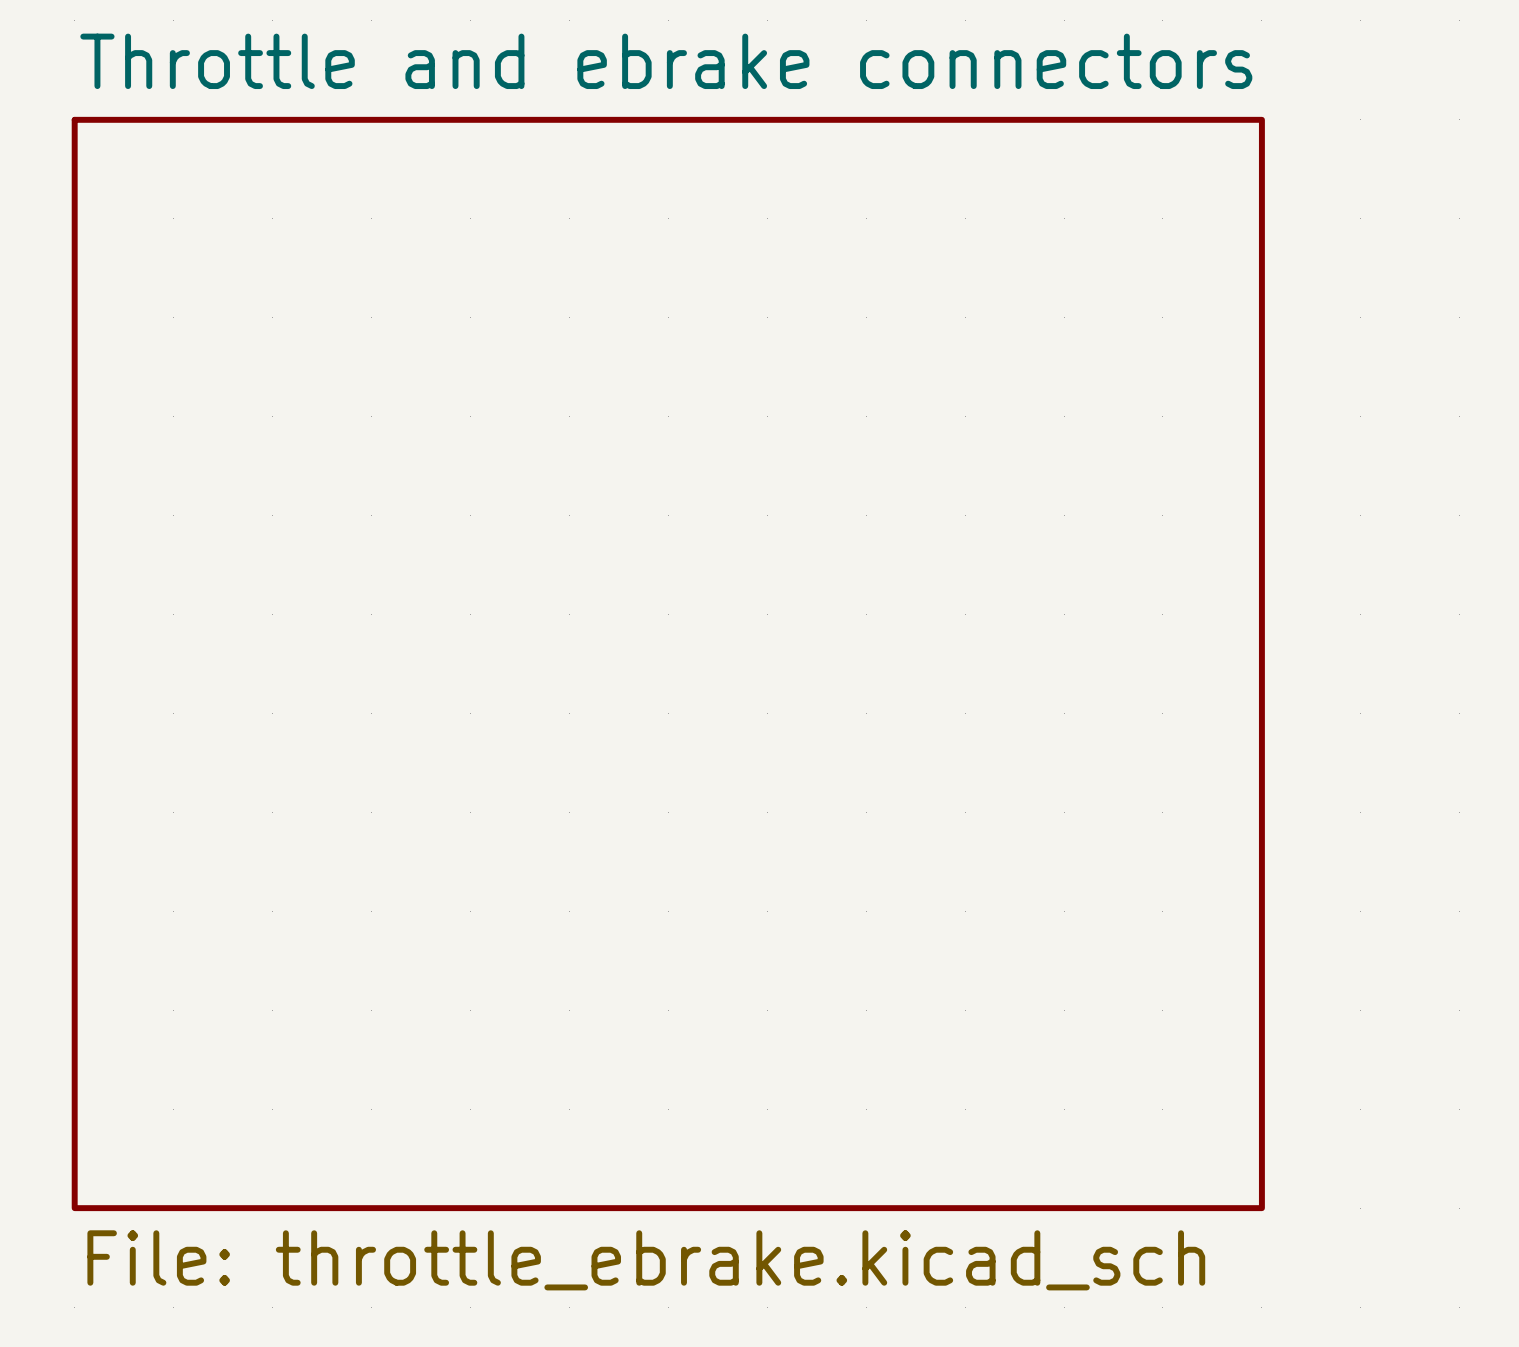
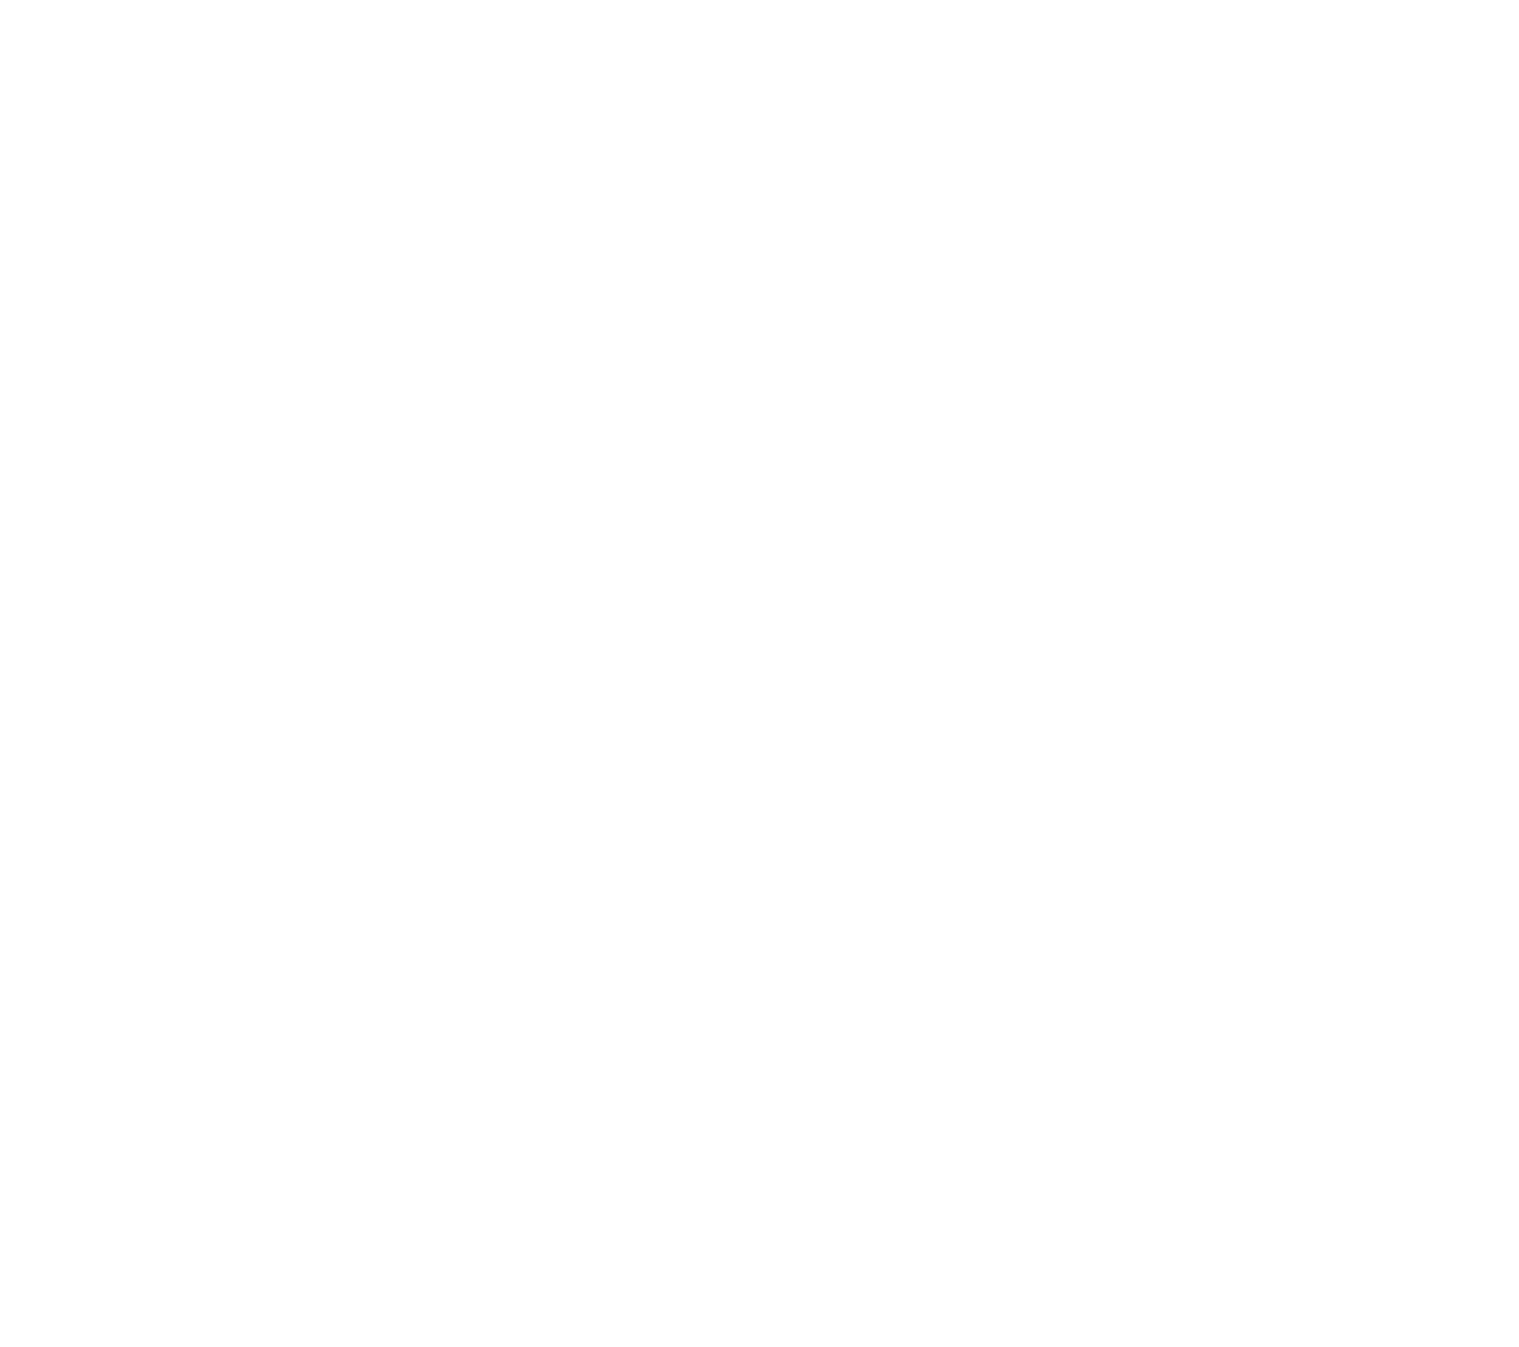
sheet Throttle and ebrake connectors: File: throttle_ebrake.kicad_sch (668, 663) -> none

